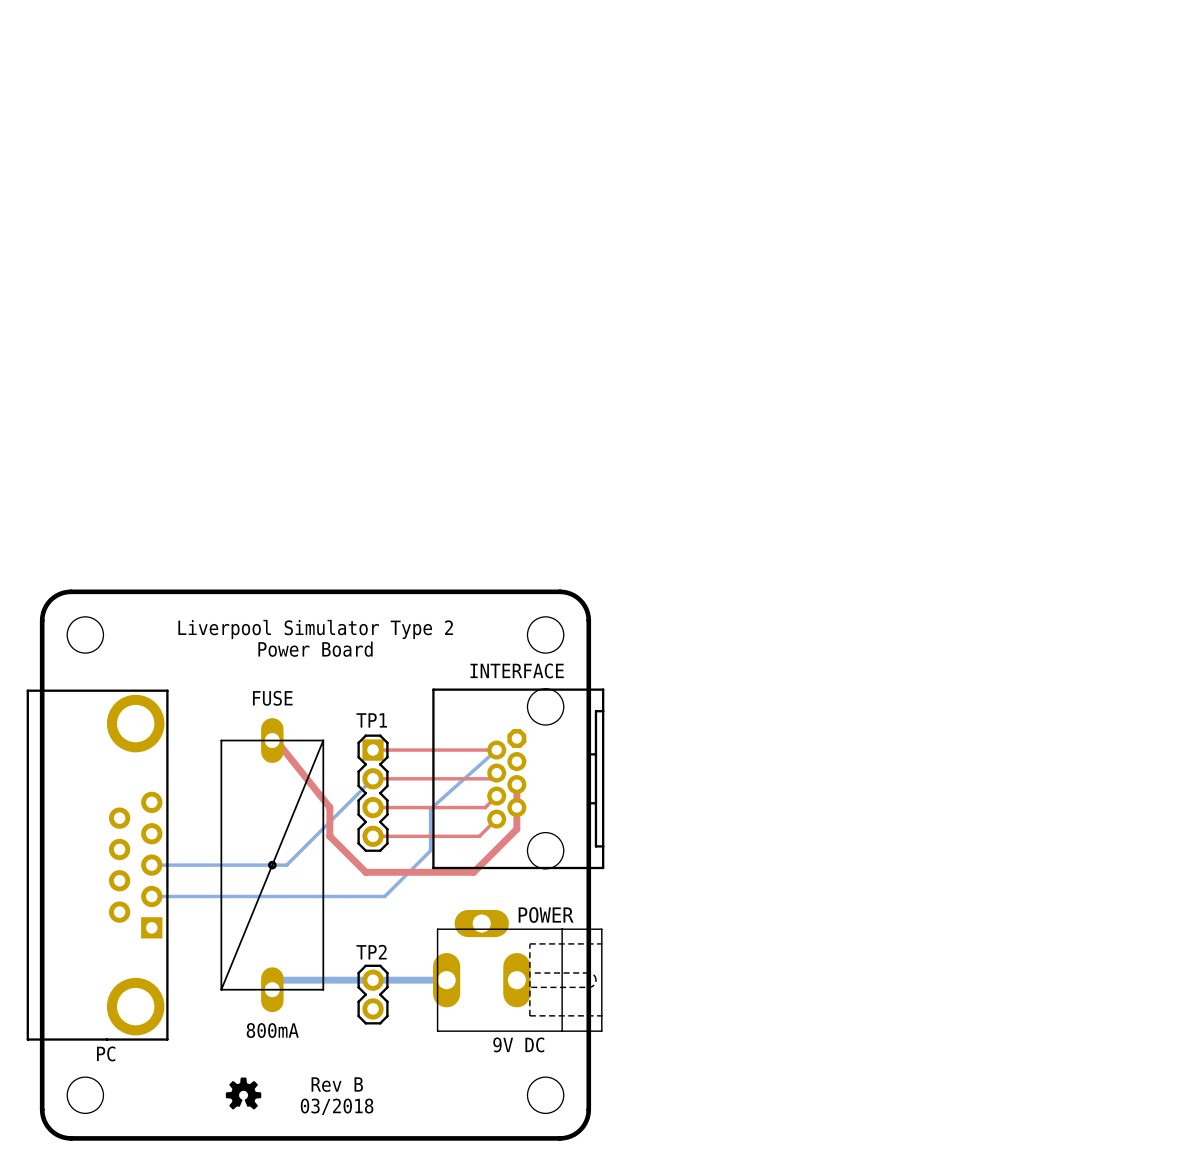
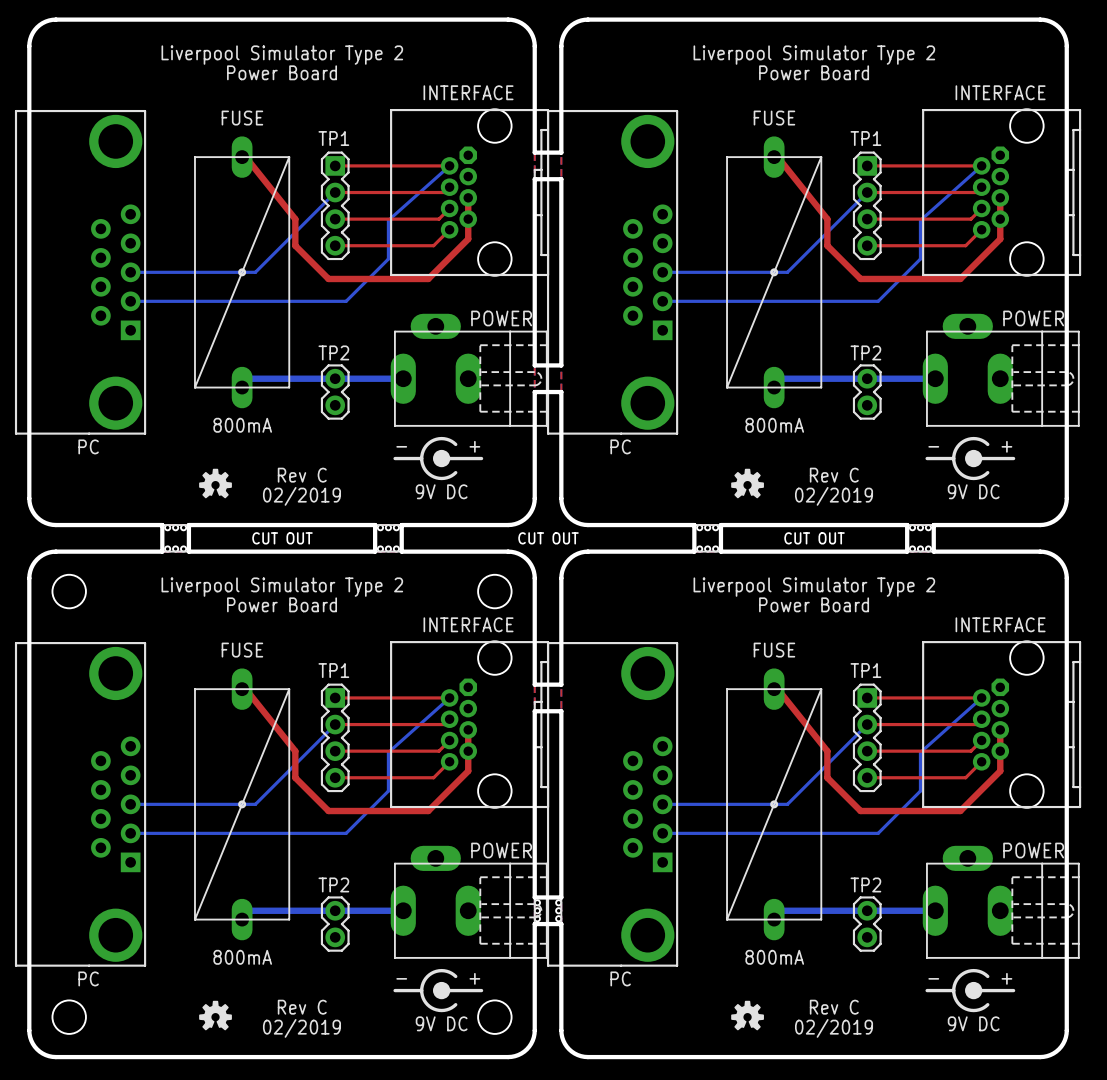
text: none -> Liverpool Simulator Type 2 (282, 55)
text: none -> Liverpool Simulator Type 2 (814, 55)
text: none -> Power Board (282, 72)
text: none -> Power Board (814, 72)
top track: none -> (242, 157) (242, 152) (295, 219) (295, 245) (328, 278) (428, 278) (468, 239) (468, 197)
top track: none -> (774, 157) (774, 152) (827, 219) (827, 245) (860, 278) (960, 278) (1000, 239) (1000, 197)
top track: none -> (335, 165) (449, 165)
bottom track: none -> (449, 165) (388, 220) (388, 259) (346, 301) (130, 301)
top track: none -> (867, 165) (981, 165)
bottom track: none -> (981, 165) (920, 220) (920, 259) (878, 301) (662, 301)
board edge: none -> (534, 179) (534, 365) (561, 365) (561, 179) (534, 179)
top track: none -> (449, 187) (444, 192) (335, 192)
top track: none -> (981, 187) (976, 192) (867, 192)
bottom track: none -> (335, 192) (255, 272) (130, 272)
part: none -> (469, 192)
bottom track: none -> (867, 192) (787, 272) (662, 272)
part: none -> (1001, 192)
part: none -> (335, 205)
part: none -> (867, 205)
top track: none -> (449, 208) (438, 219) (335, 219)
top track: none -> (981, 208) (971, 219) (867, 219)
top track: none -> (449, 229) (433, 245) (335, 245)
top track: none -> (981, 229) (965, 245) (867, 245)
part: none -> (80, 272)
part: none -> 800mA (242, 272)
part: none -> (612, 272)
part: none -> 800mA (774, 272)
part: none -> 9V DC (469, 370)
part: none -> 9V DC (1001, 370)
bottom track: none -> (403, 378) (250, 378) (242, 387)
bottom track: none -> (935, 378) (782, 378) (774, 387)
part: none -> (335, 392)
part: none -> (867, 392)
drawing: none -> [393, 436, 484, 481]
drawing: none -> [925, 436, 1016, 481]
drawing: none -> [199, 468, 232, 499]
drawing: none -> [731, 468, 764, 499]
text: none -> Rev C (302, 475)
text: none -> Rev C (834, 475)
text: none -> 02/2019 (301, 496)
text: none -> 02/2019 (834, 496)
board edge: none -> (720, 525) (907, 525) (907, 551) (720, 551) (720, 525)
part: none -> (175, 538)
text: none -> CUT OUT (282, 538)
part: none -> (388, 538)
text: none -> CUT OUT (548, 538)
part: none -> (707, 538)
text: none -> CUT OUT (814, 538)
part: none -> (920, 538)
board edge: (186, 591) (214, 591) -> (375, 551) (375, 525) (188, 525) (188, 551)
board edge: (416, 591) (444, 591) -> (534, 684) (561, 684) (561, 578) (563, 568) (569, 559) (577, 553) (587, 551) (694, 551) (694, 525) (587, 525) (571, 519) (564, 511) (561, 501) (561, 392) (534, 392) (534, 498) (529, 514) (521, 521) (511, 524) (401, 525) (401, 551)
text: none -> Liverpool Simulator Type 2 (814, 587)
text: none -> Power Board (814, 604)
board edge: (588, 735) (588, 764) -> (534, 897) (561, 897) (561, 711) (534, 711)
top track: none -> (774, 689) (774, 684) (827, 751) (827, 777) (860, 811) (960, 811) (1000, 771) (1000, 729)
top track: none -> (867, 697) (981, 697)
bottom track: none -> (981, 697) (920, 752) (920, 791) (878, 833) (662, 833)
top track: none -> (981, 719) (976, 724) (867, 724)
bottom track: none -> (867, 724) (787, 804) (662, 804)
part: none -> (1001, 724)
part: none -> (867, 737)
top track: none -> (981, 740) (971, 751) (867, 751)
top track: none -> (981, 761) (965, 777) (867, 777)
part: none -> (612, 804)
part: none -> 800mA (774, 804)
board edge: (588, 965) (588, 994) -> (162, 551) (162, 525) (52, 524) (37, 517) (30, 505) (29, 46) (32, 32) (42, 23) (55, 19) (515, 20) (526, 27) (534, 42) (534, 152) (561, 152) (561, 42) (569, 27) (581, 20) (1040, 19) (1050, 21) (1058, 27) (1064, 36) (1066, 46) (1065, 505) (1058, 517) (1043, 524) (933, 525) (933, 551) (1043, 551) (1058, 559) (1065, 571) (1066, 1030) (1063, 1043) (1053, 1053) (1040, 1057) (581, 1056) (569, 1049) (561, 1033) (561, 924) (534, 924)
part: none -> 9V DC (1001, 902)
part: none -> (548, 910)
bottom track: none -> (935, 910) (782, 910) (774, 919)
part: none -> (867, 924)
drawing: none -> [393, 968, 484, 1013]
drawing: none -> [925, 968, 1016, 1013]
POWER value position: 9V DC (518, 1044) -> 9V DC (441, 1023)
drawing: none -> [731, 1000, 764, 1031]
text: Rev B (337, 1084) -> Rev C (302, 1007)
text: none -> Rev C (834, 1007)
text: 03/2018 (337, 1106) -> 02/2019 (301, 1028)
text: none -> 02/2019 (834, 1028)

